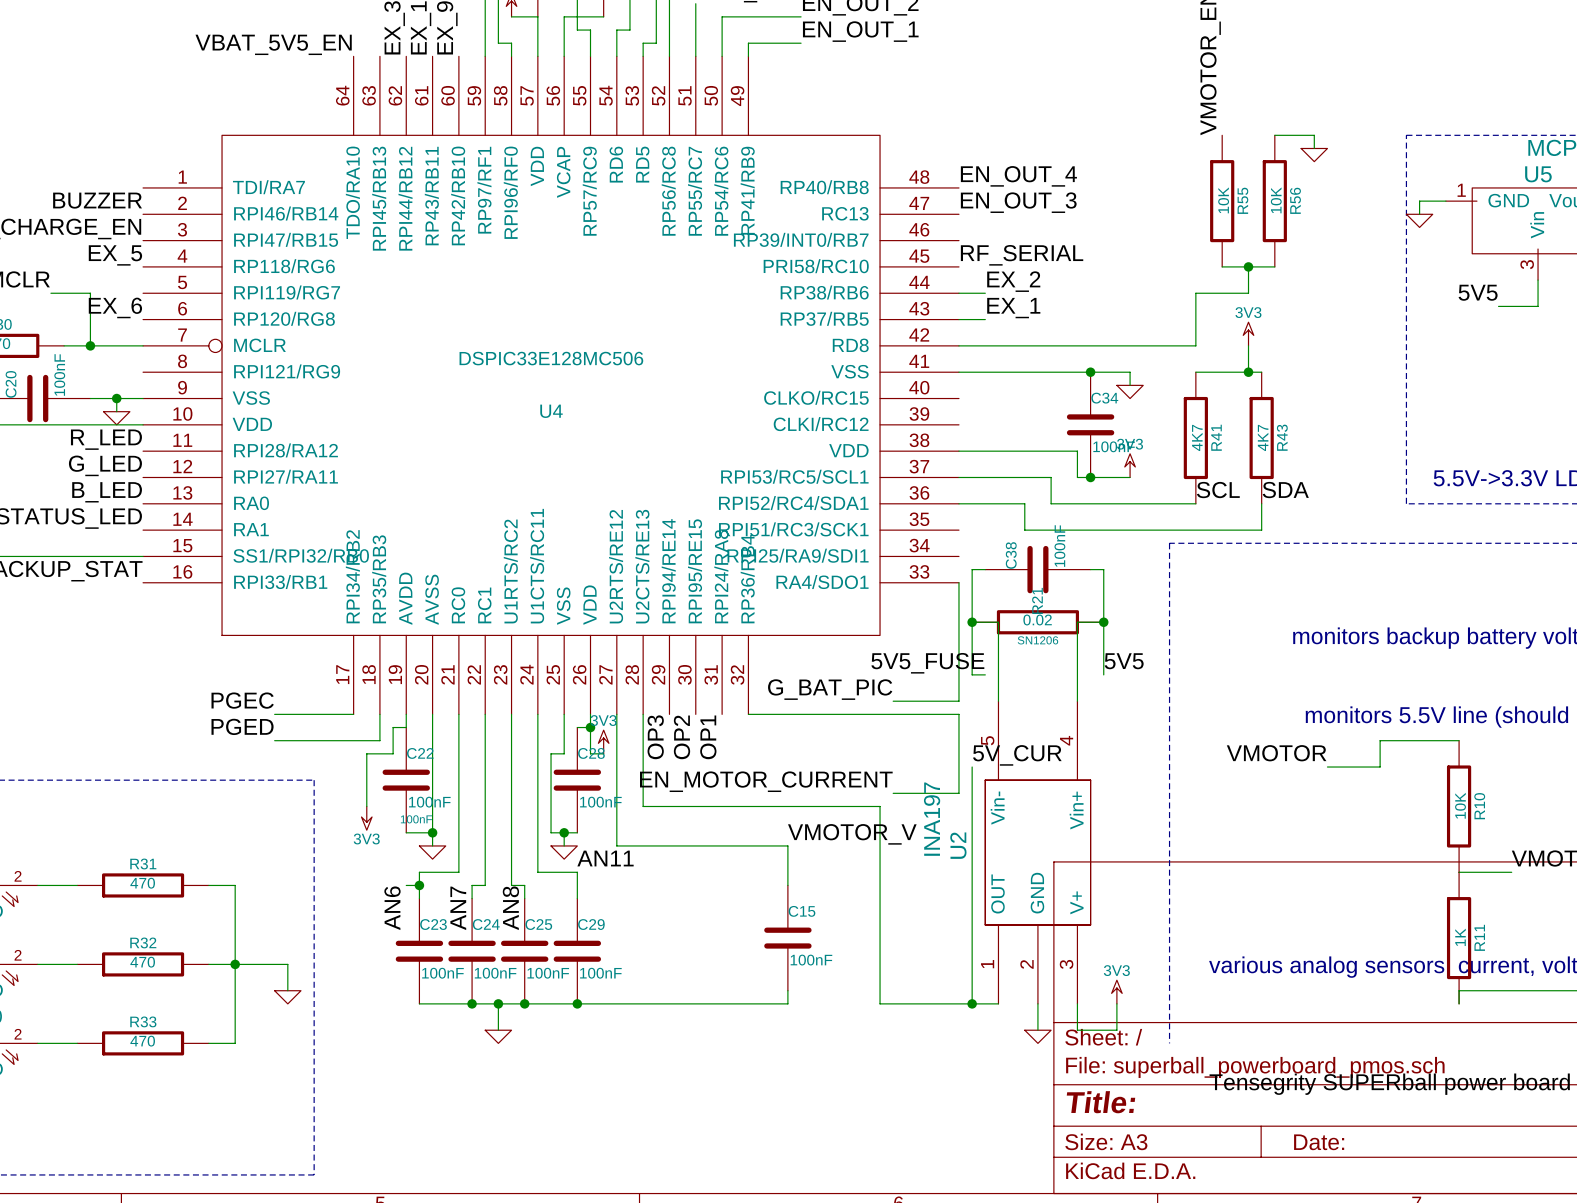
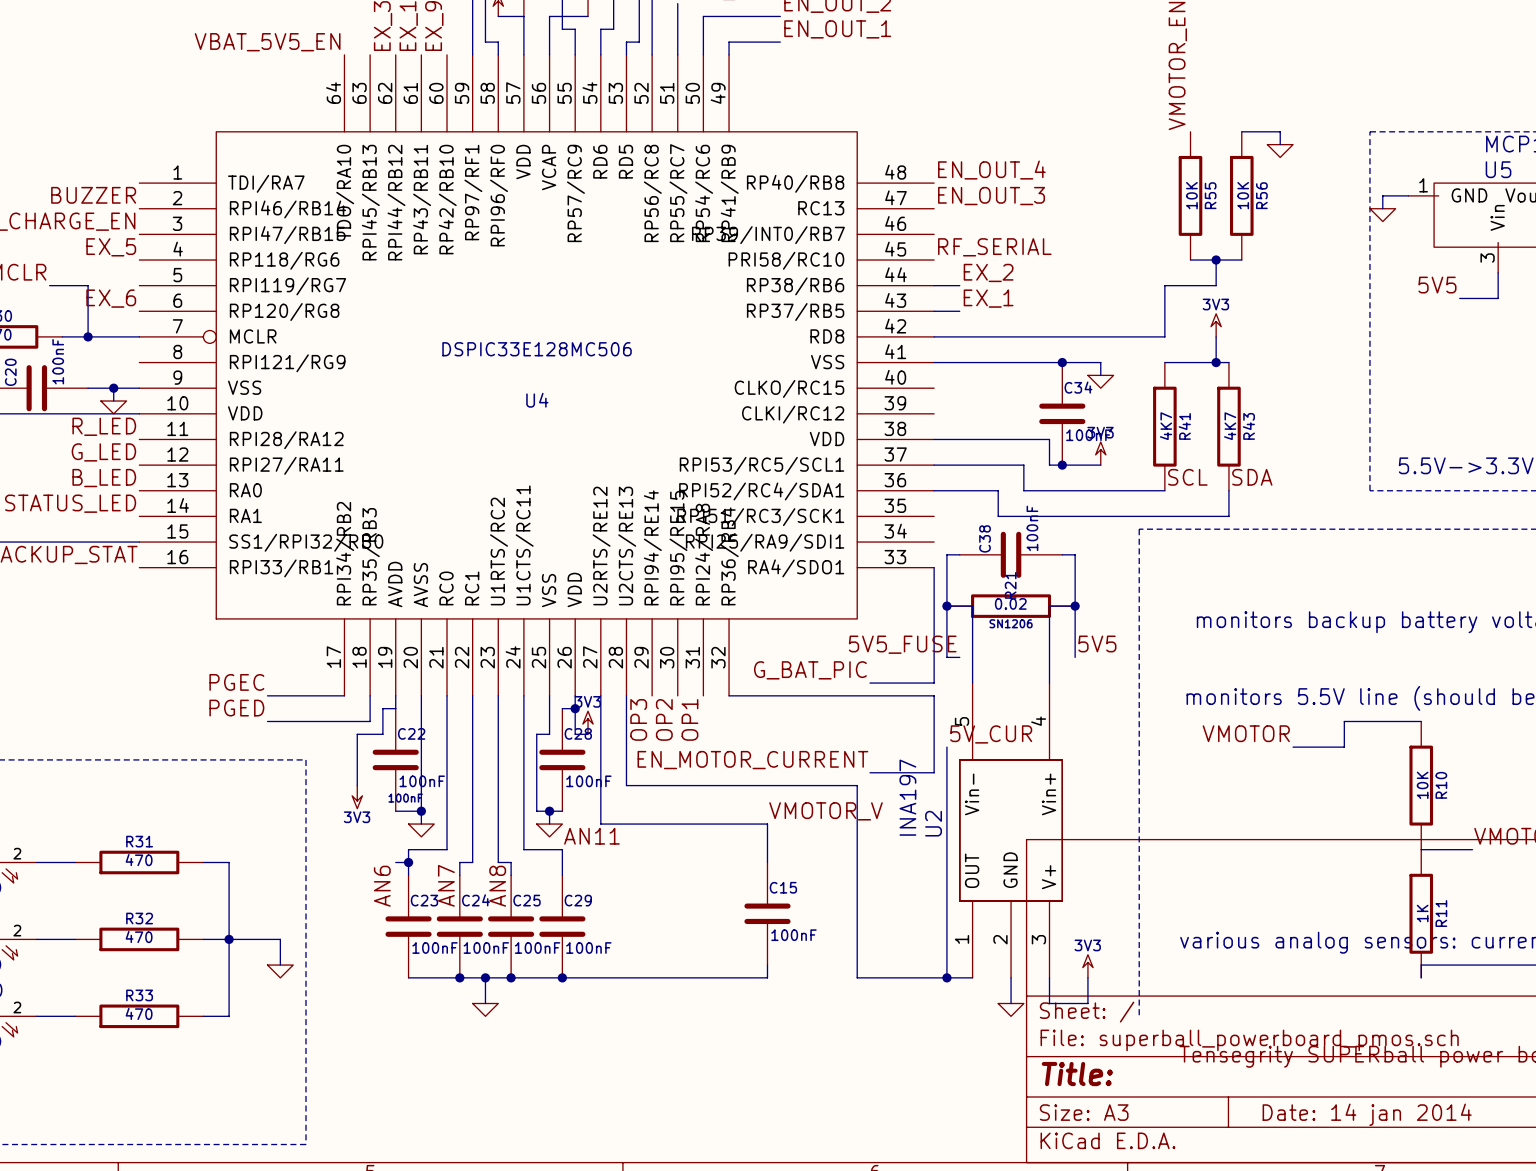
title block: Date: (1319, 1142) -> Date: 14 jan 2014 (1367, 1114)

